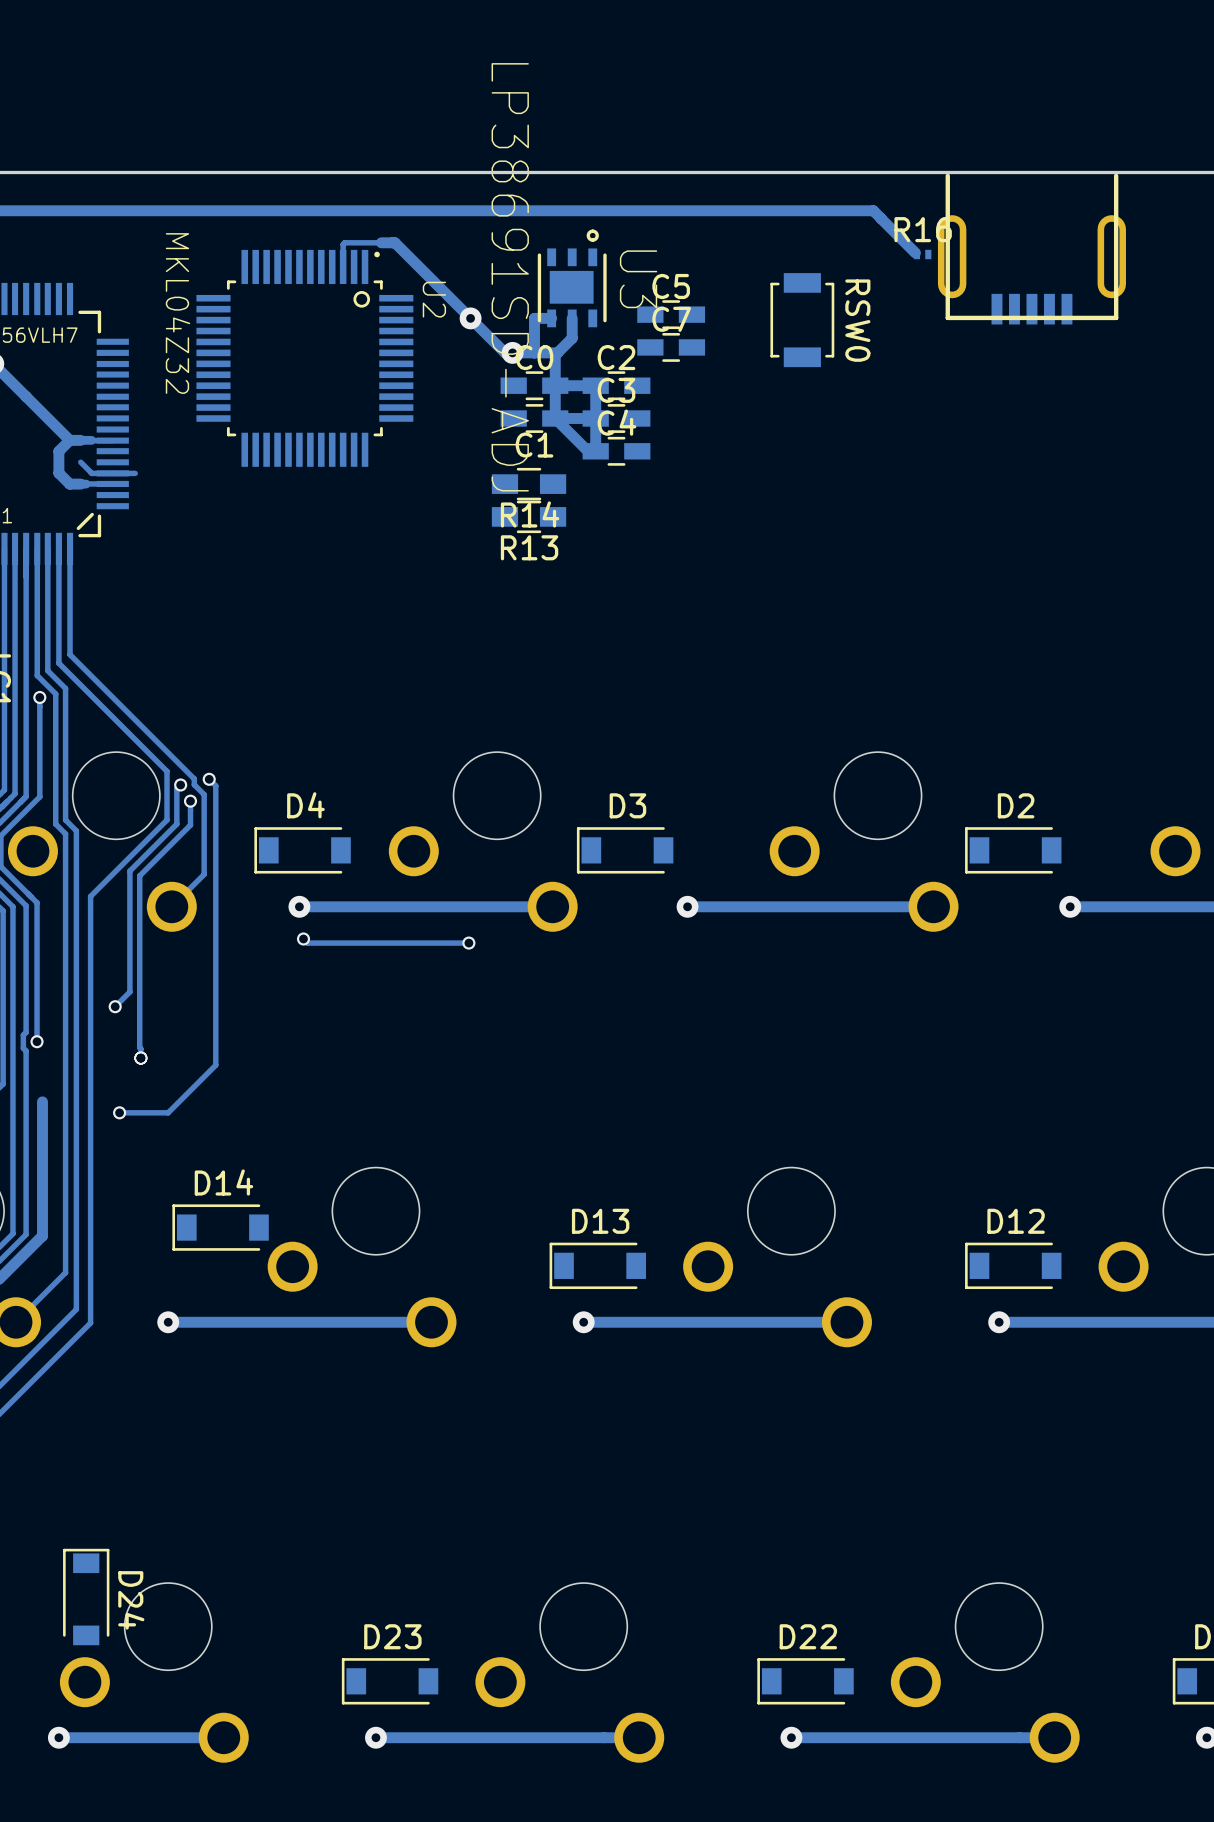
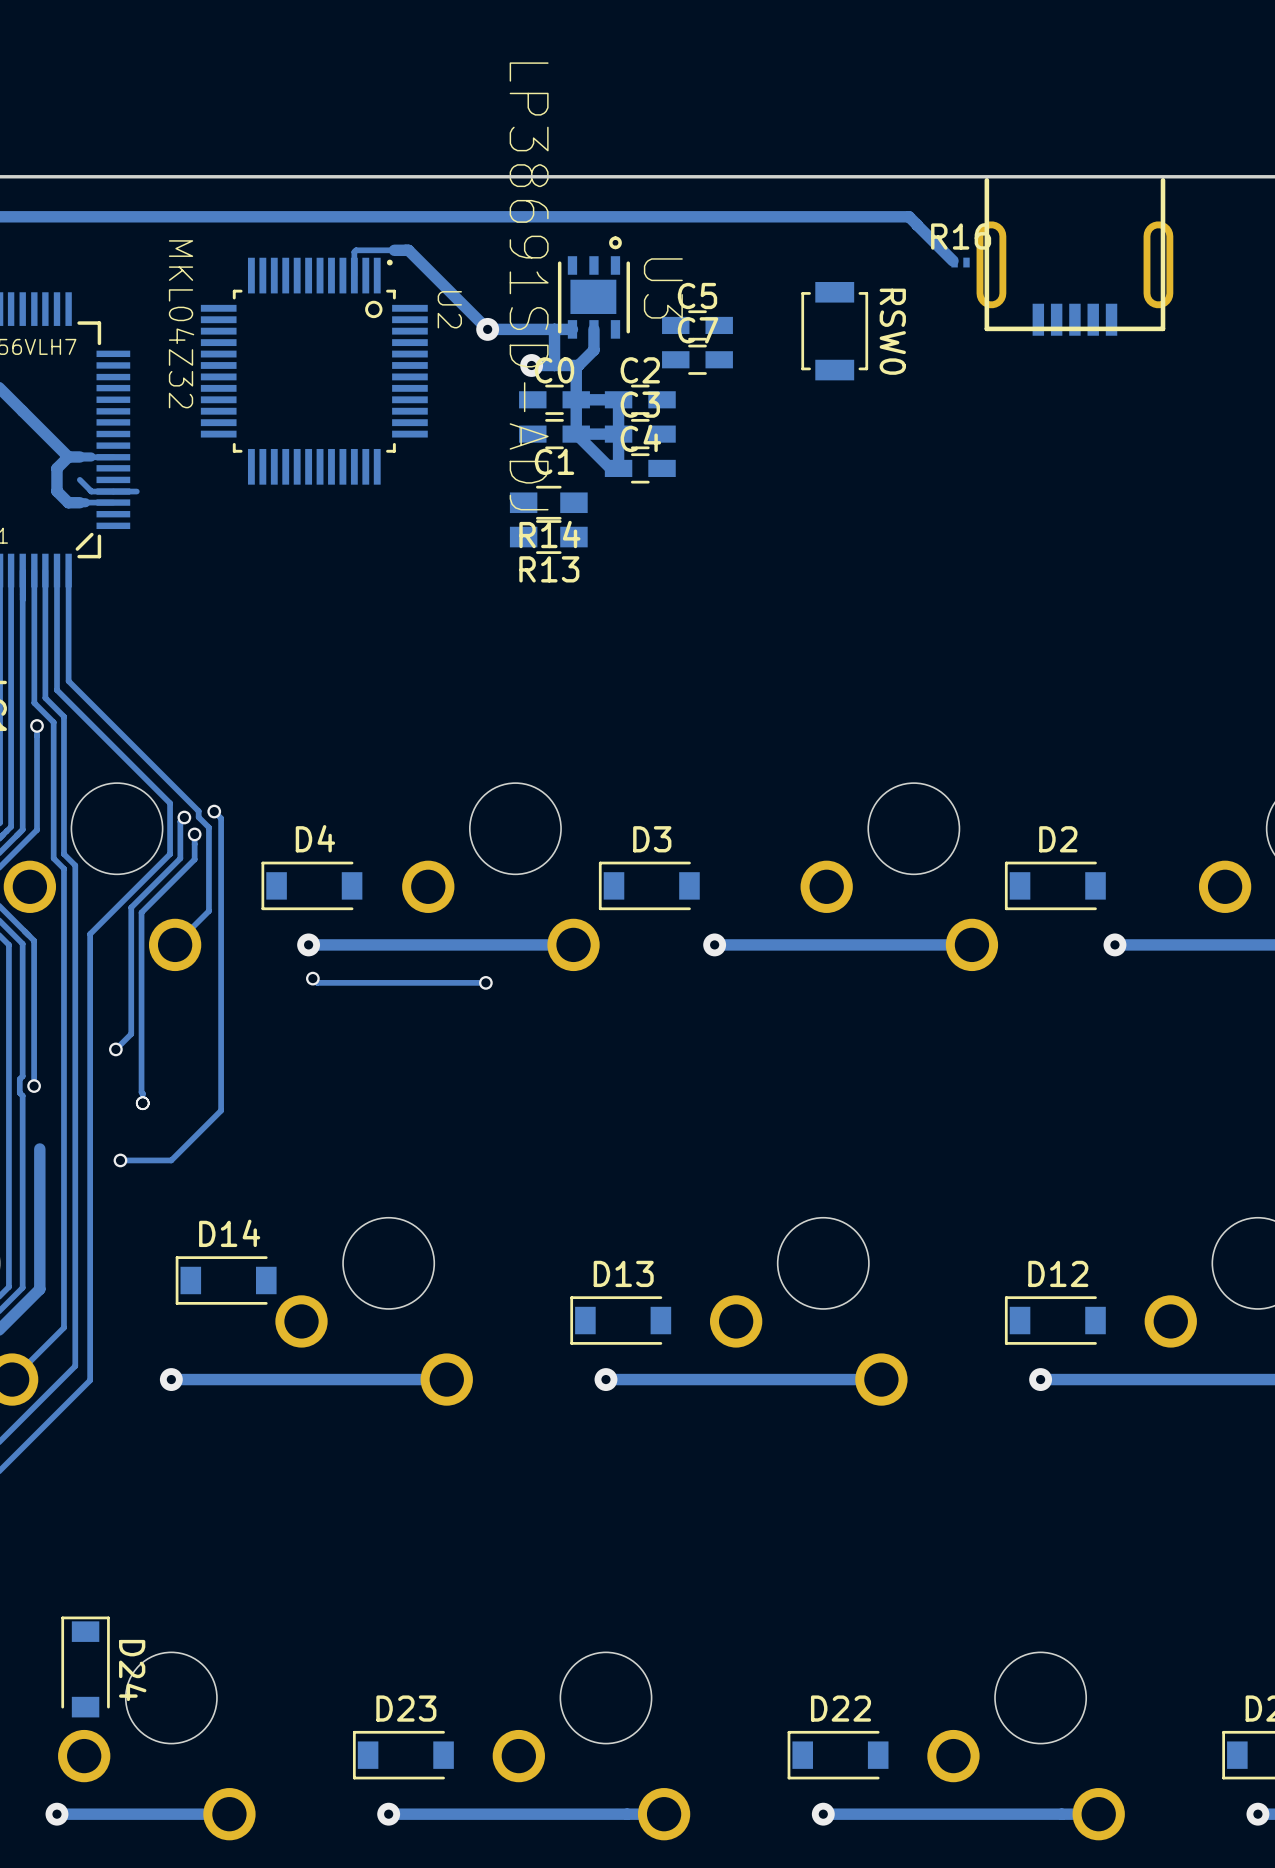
track: (470, 318) (505, 352) (512, 352) -> (487, 329) (554, 329)

